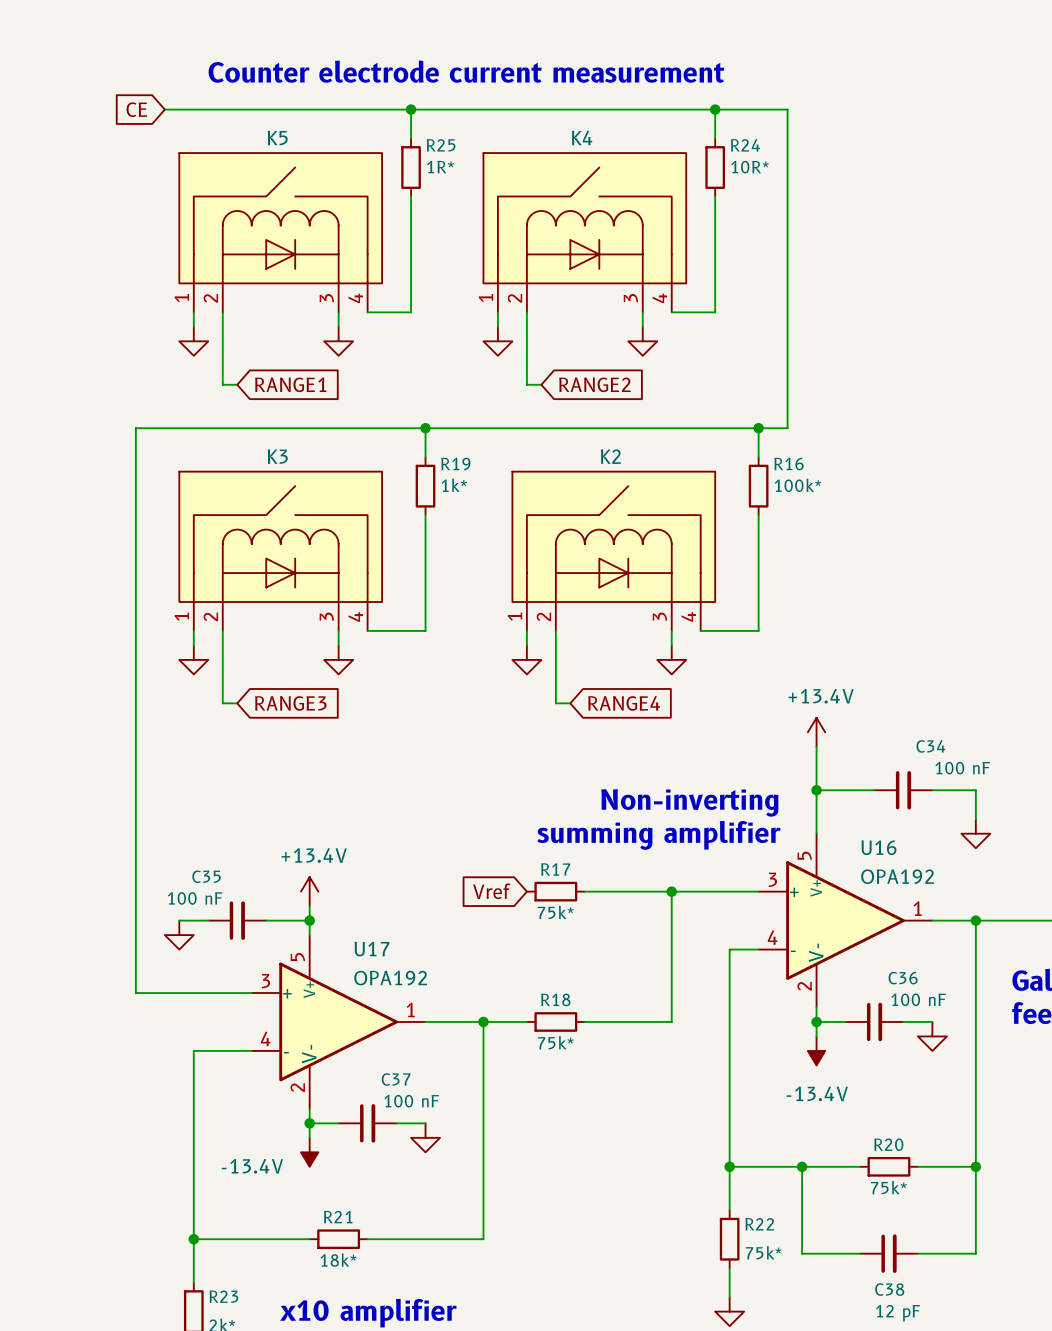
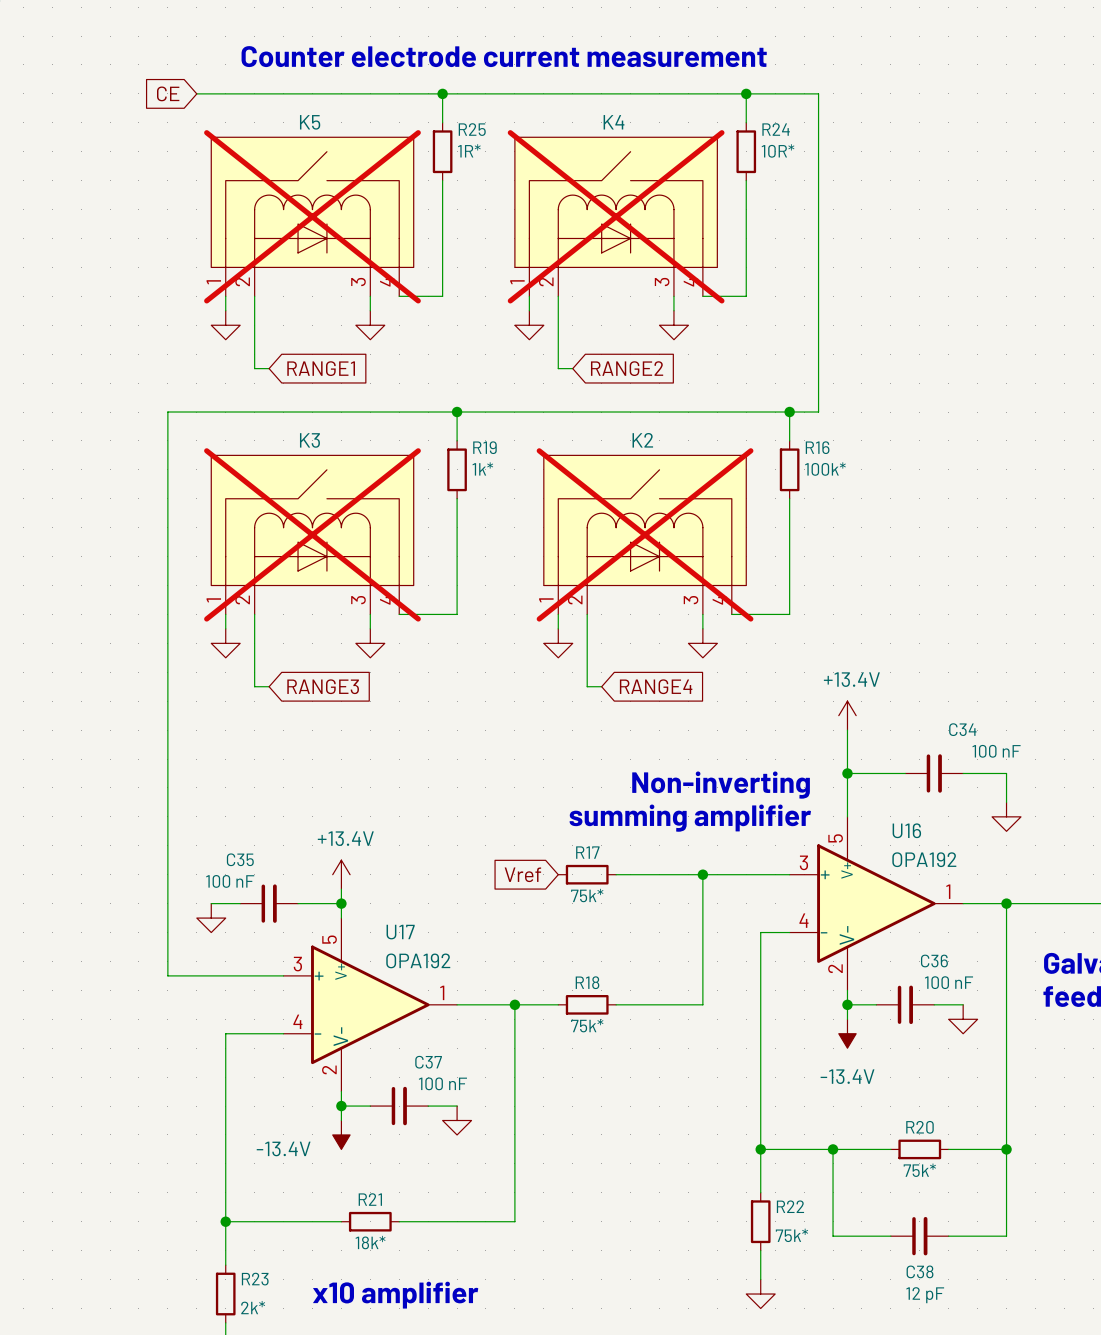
K5 do-not-place cross: none -> (312, 216)
K4 do-not-place cross: none -> (616, 216)
K3 do-not-place cross: none -> (312, 534)
K2 do-not-place cross: none -> (645, 534)

